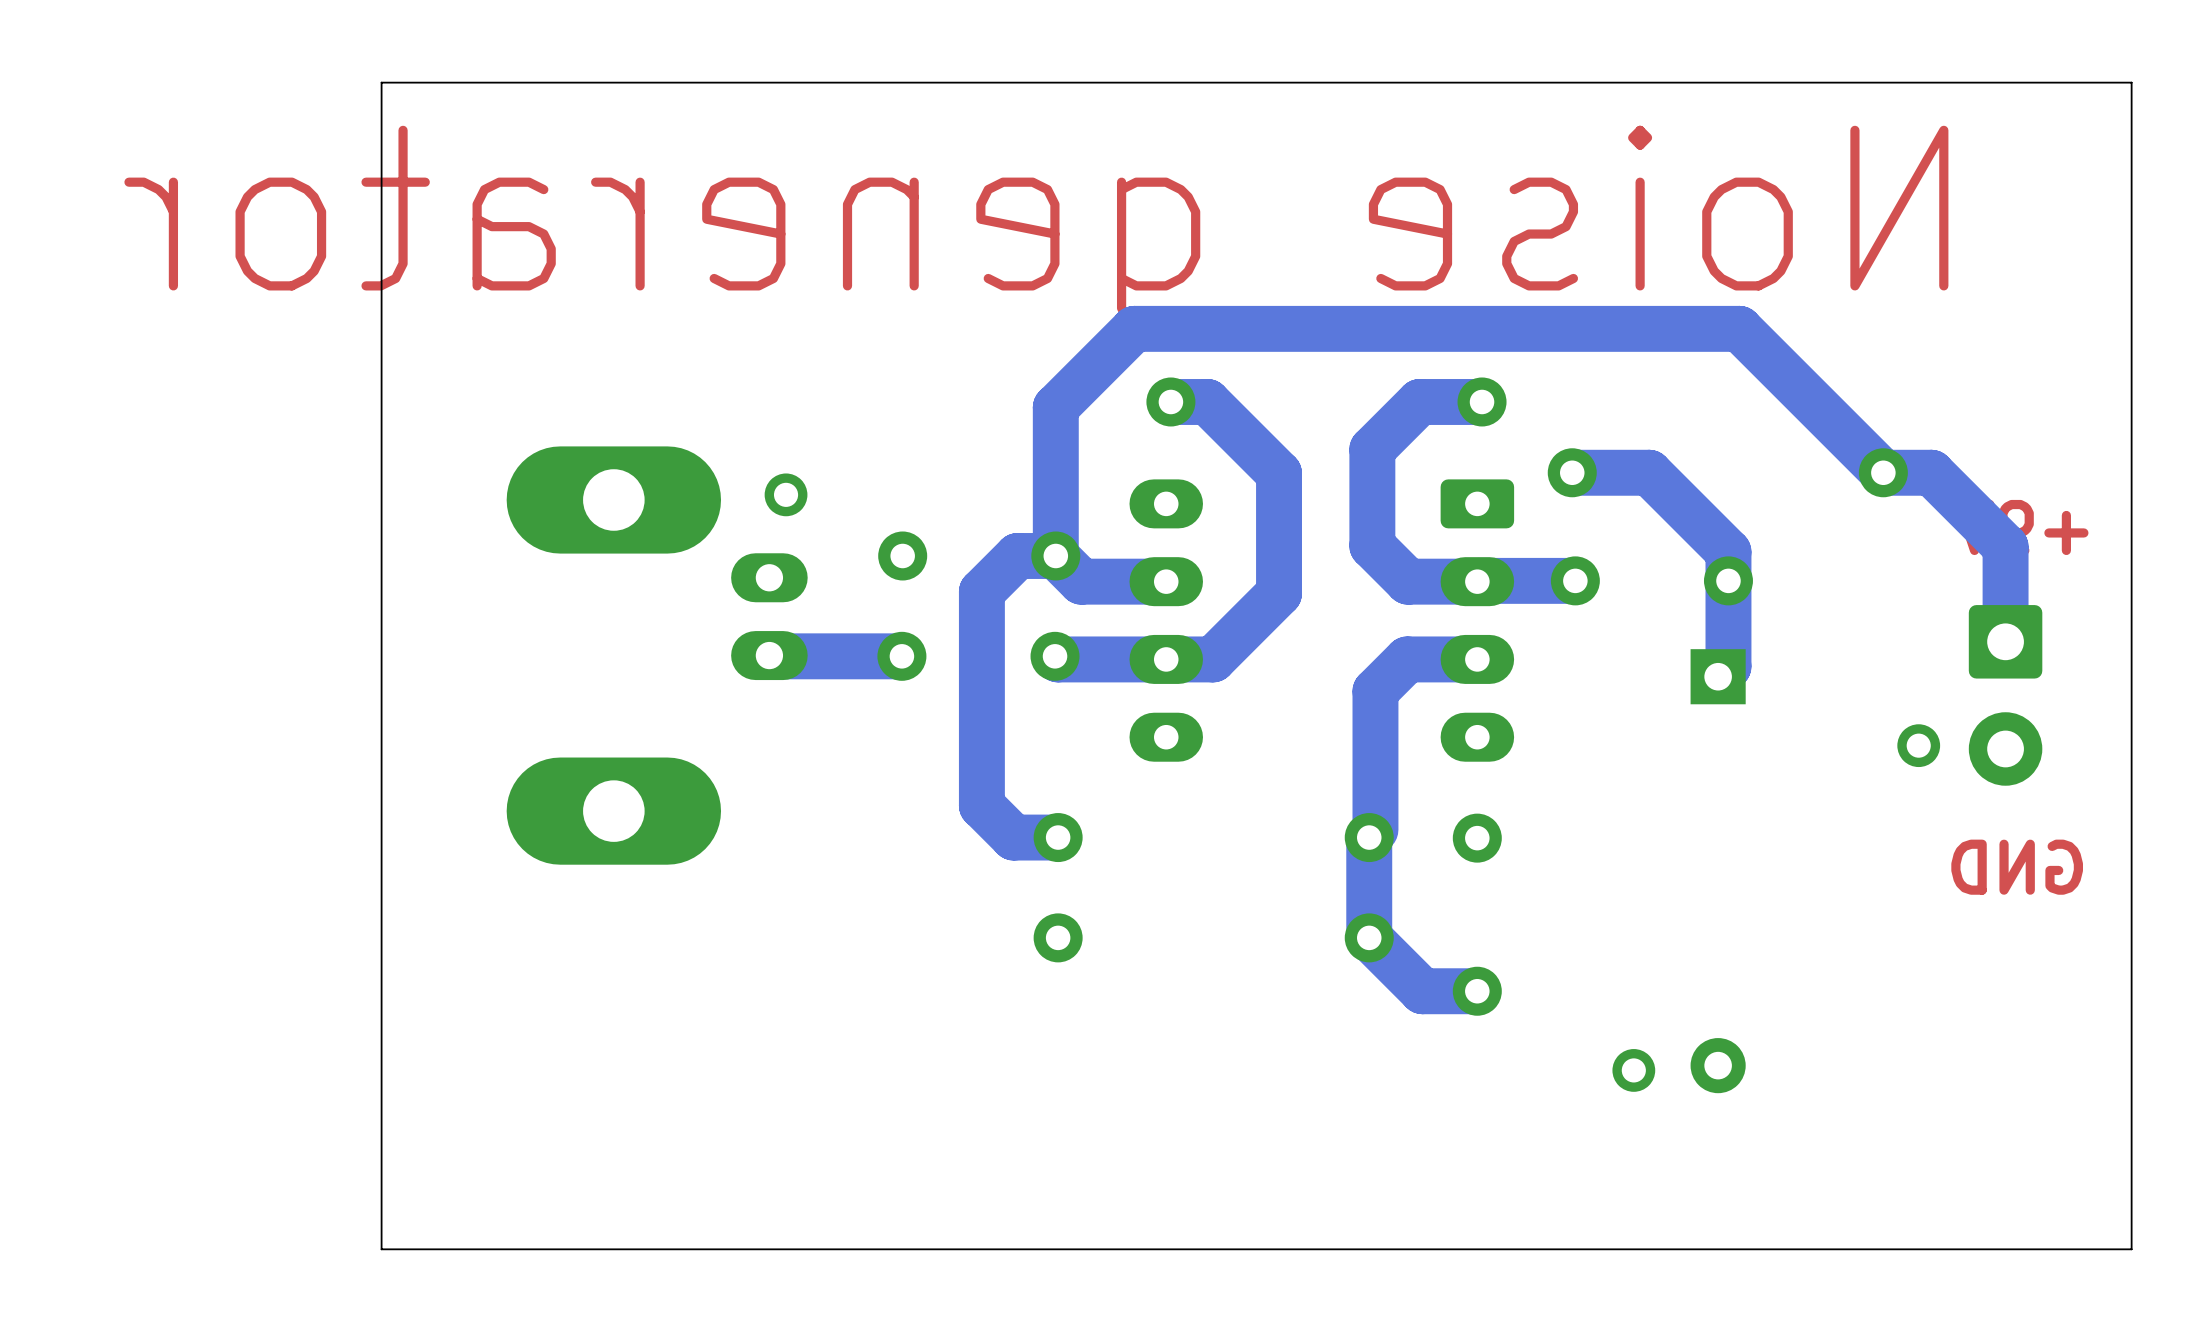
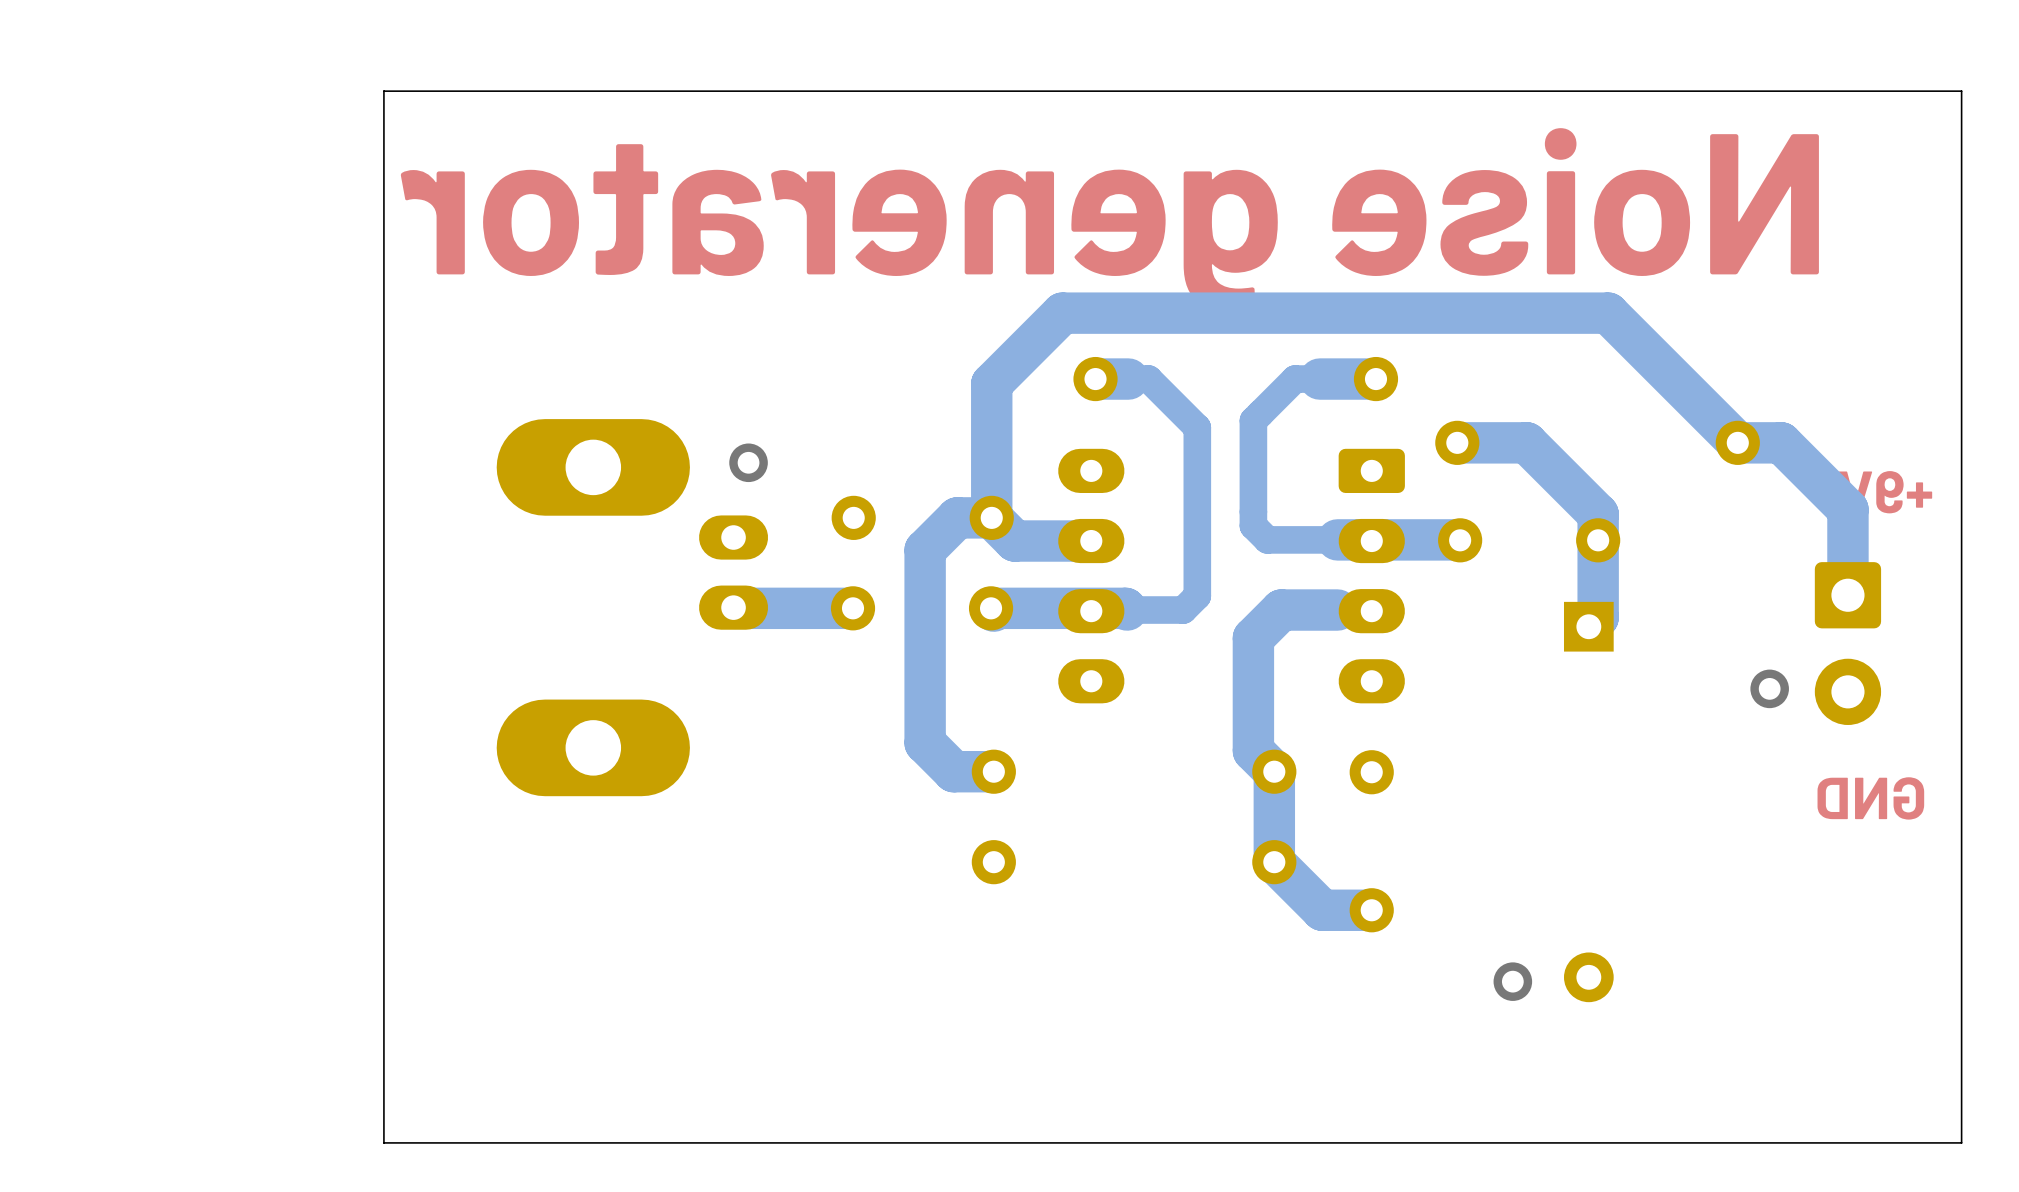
bottom track: (1207, 401) (1279, 473) (1279, 593) (1212, 659) (1058, 659) -> (1128, 379) (1148, 379) (1197, 427) (1197, 596) (1183, 610) (991, 608)
bottom track: (1419, 401) (1372, 449) (1372, 545) (1408, 581) (1575, 580) -> (1319, 379) (1295, 379) (1253, 420) (1253, 525) (1267, 539) (1460, 540)
bottom track: none -> (1337, 610) (1281, 610) (1253, 638) (1253, 750) (1274, 771)
bottom track: (1477, 659) (1407, 659) (1375, 691) (1375, 829) -> none

